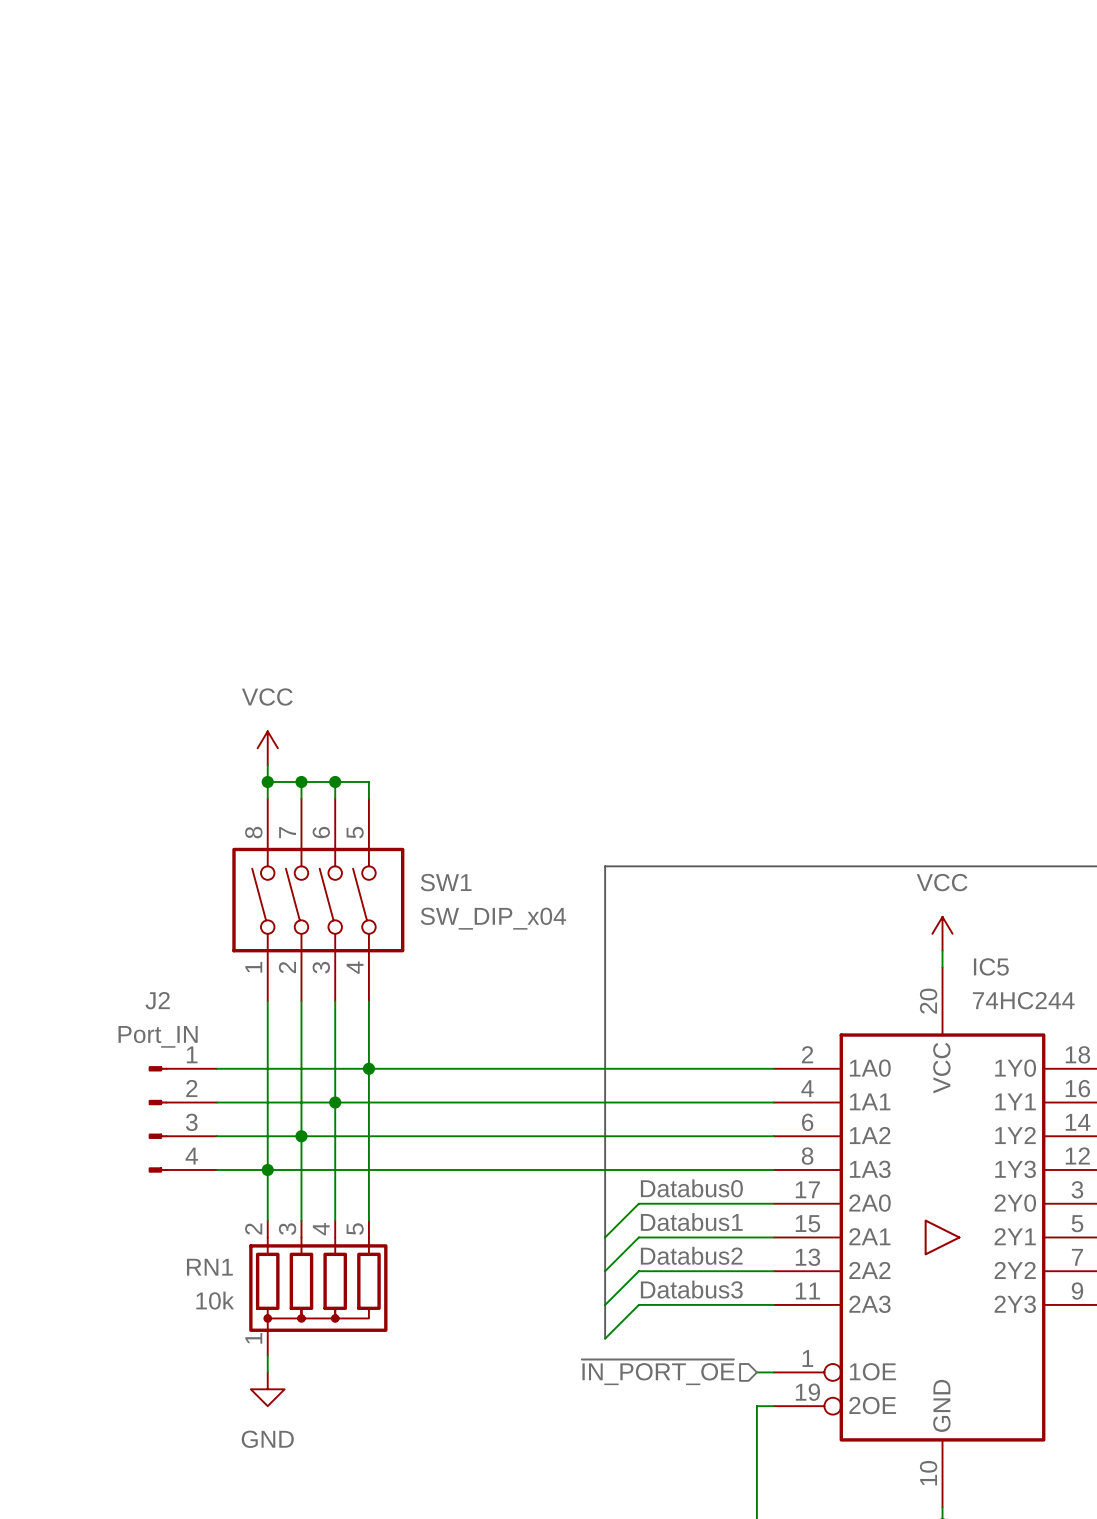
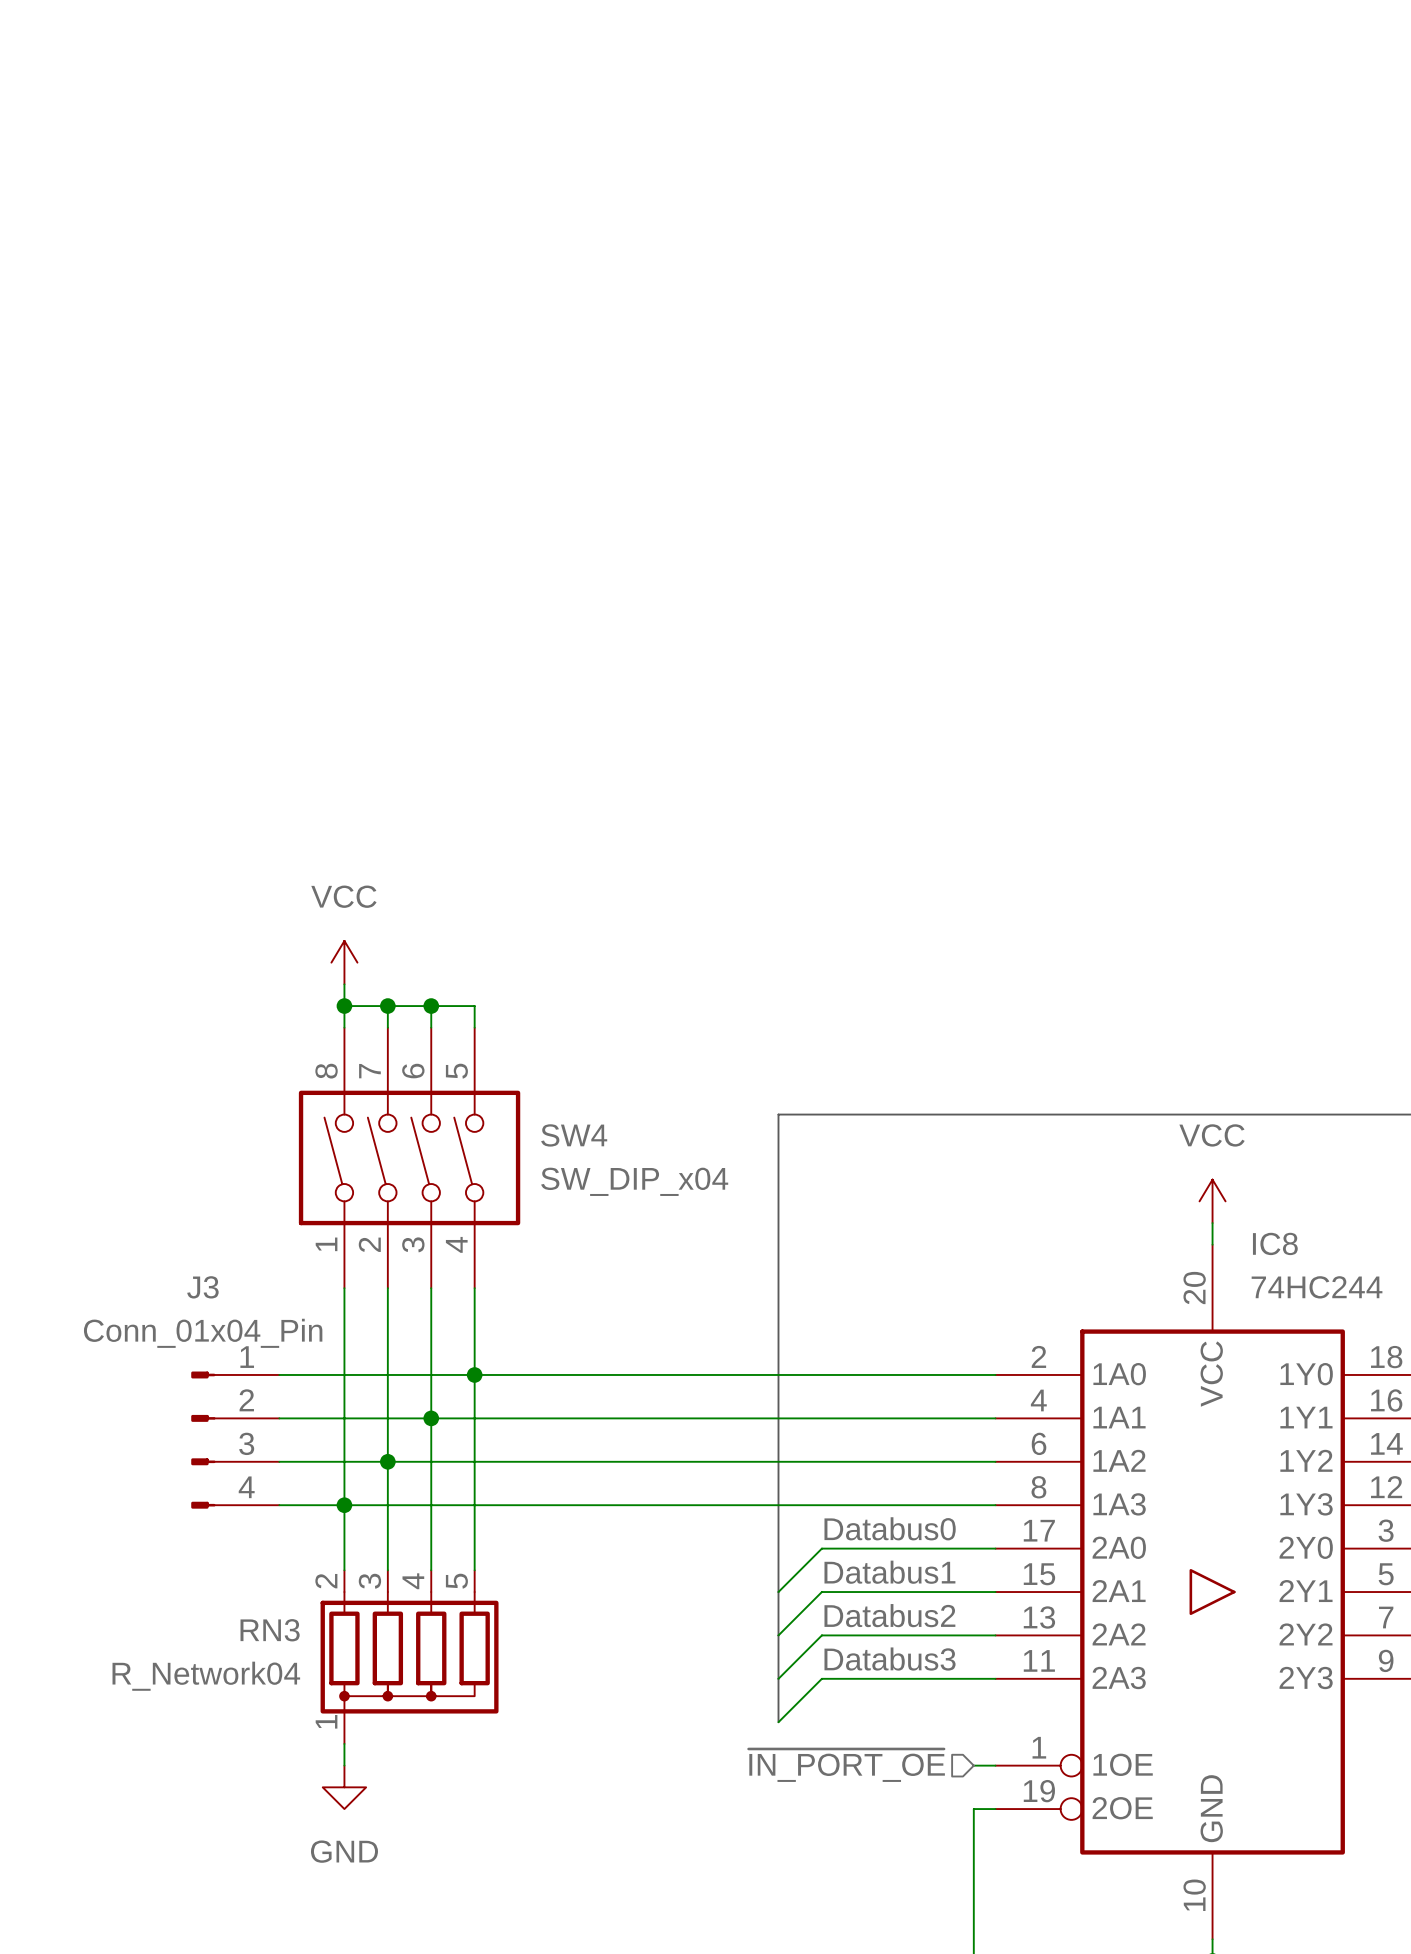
SW1 name: SW1 (446, 882) -> SW4 (574, 1135)
IC5 name: IC5 (991, 966) -> IC8 (1275, 1243)
J2 name: J2 (157, 1000) -> J3 (202, 1287)
J2 value: Port_IN (158, 1036) -> Conn_01x04_Pin (203, 1333)
RN1 name: RN1 (209, 1267) -> RN3 (270, 1630)
RN1 value: 10k (215, 1300) -> R_Network04 (206, 1676)

